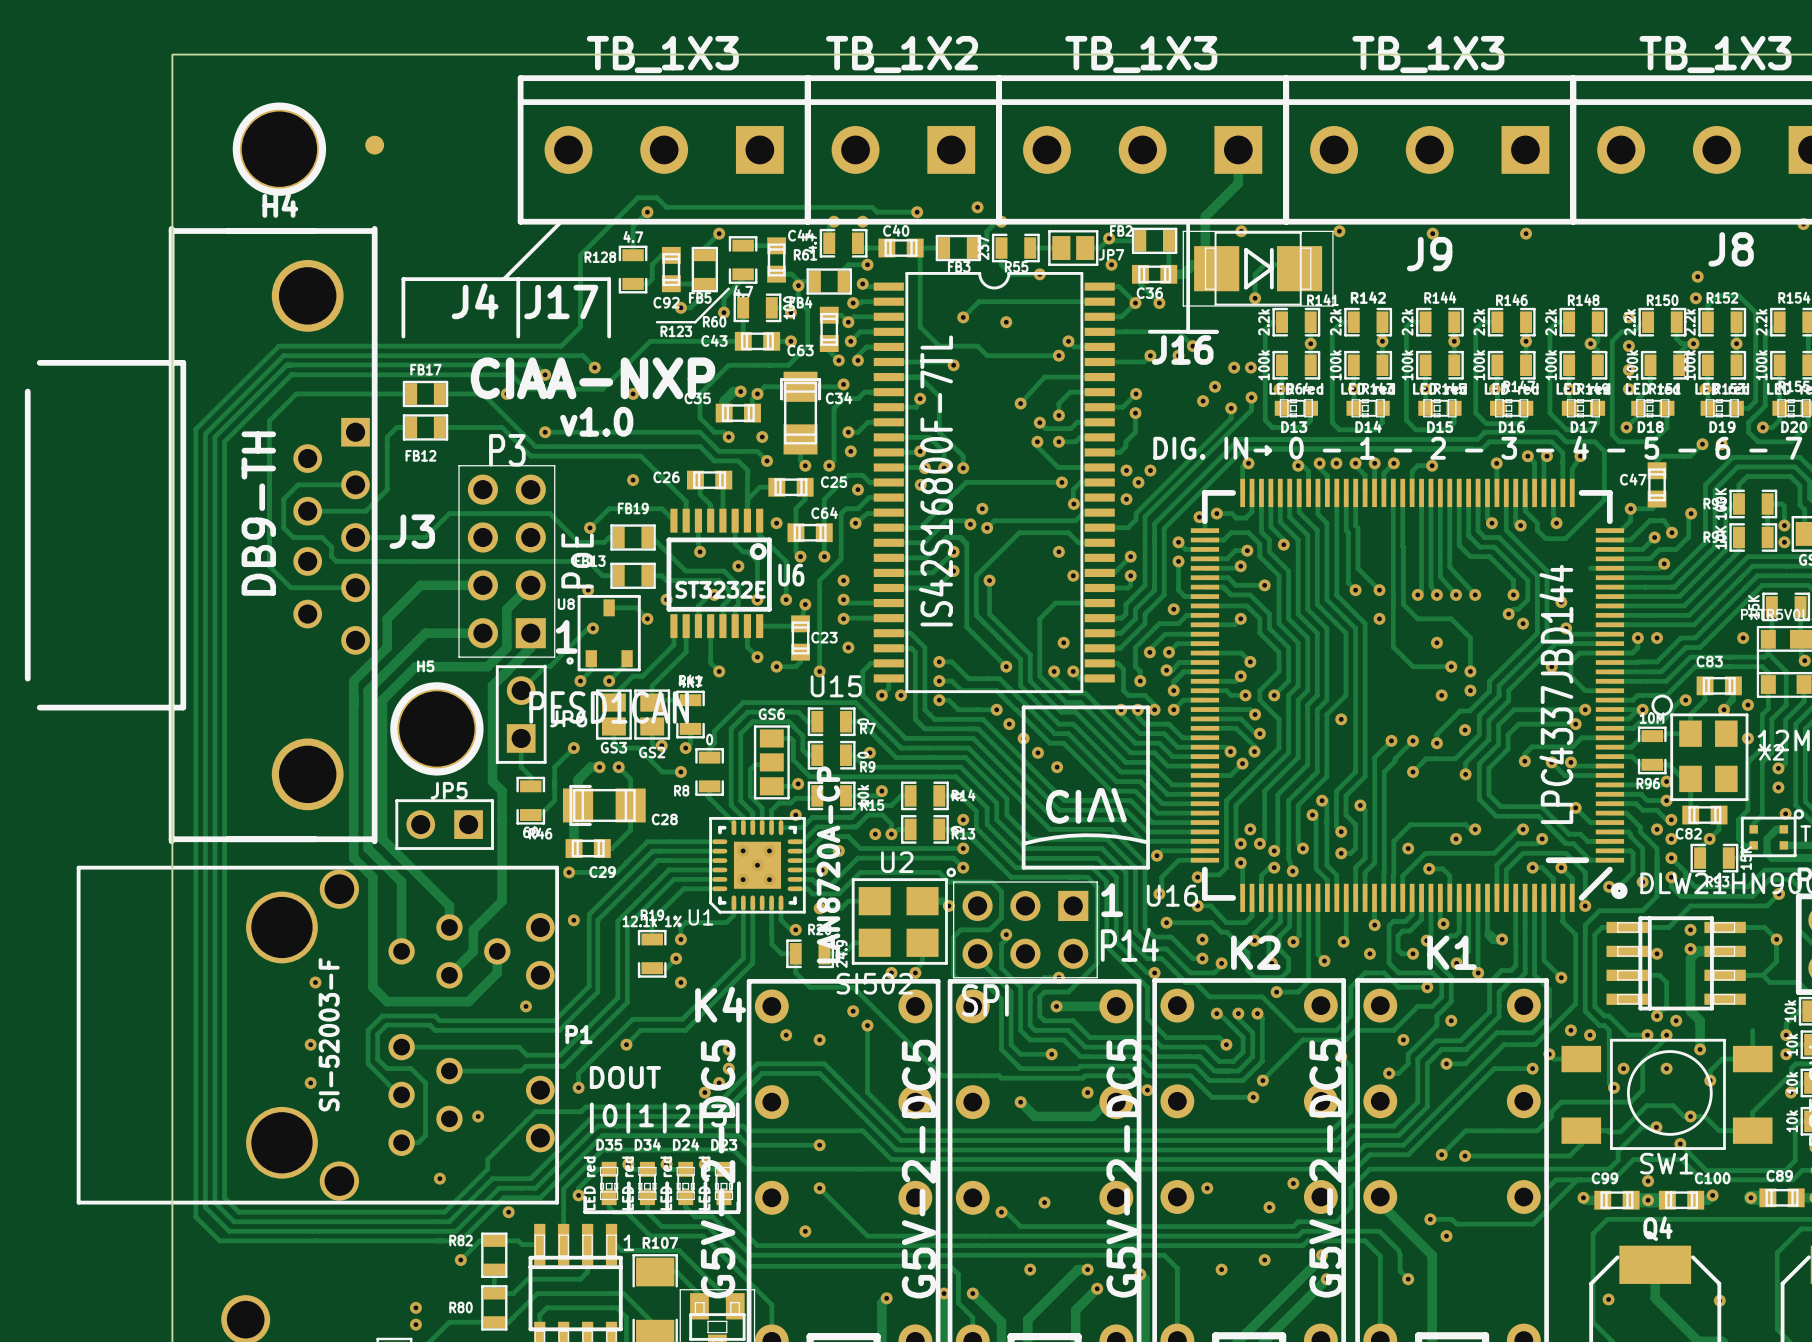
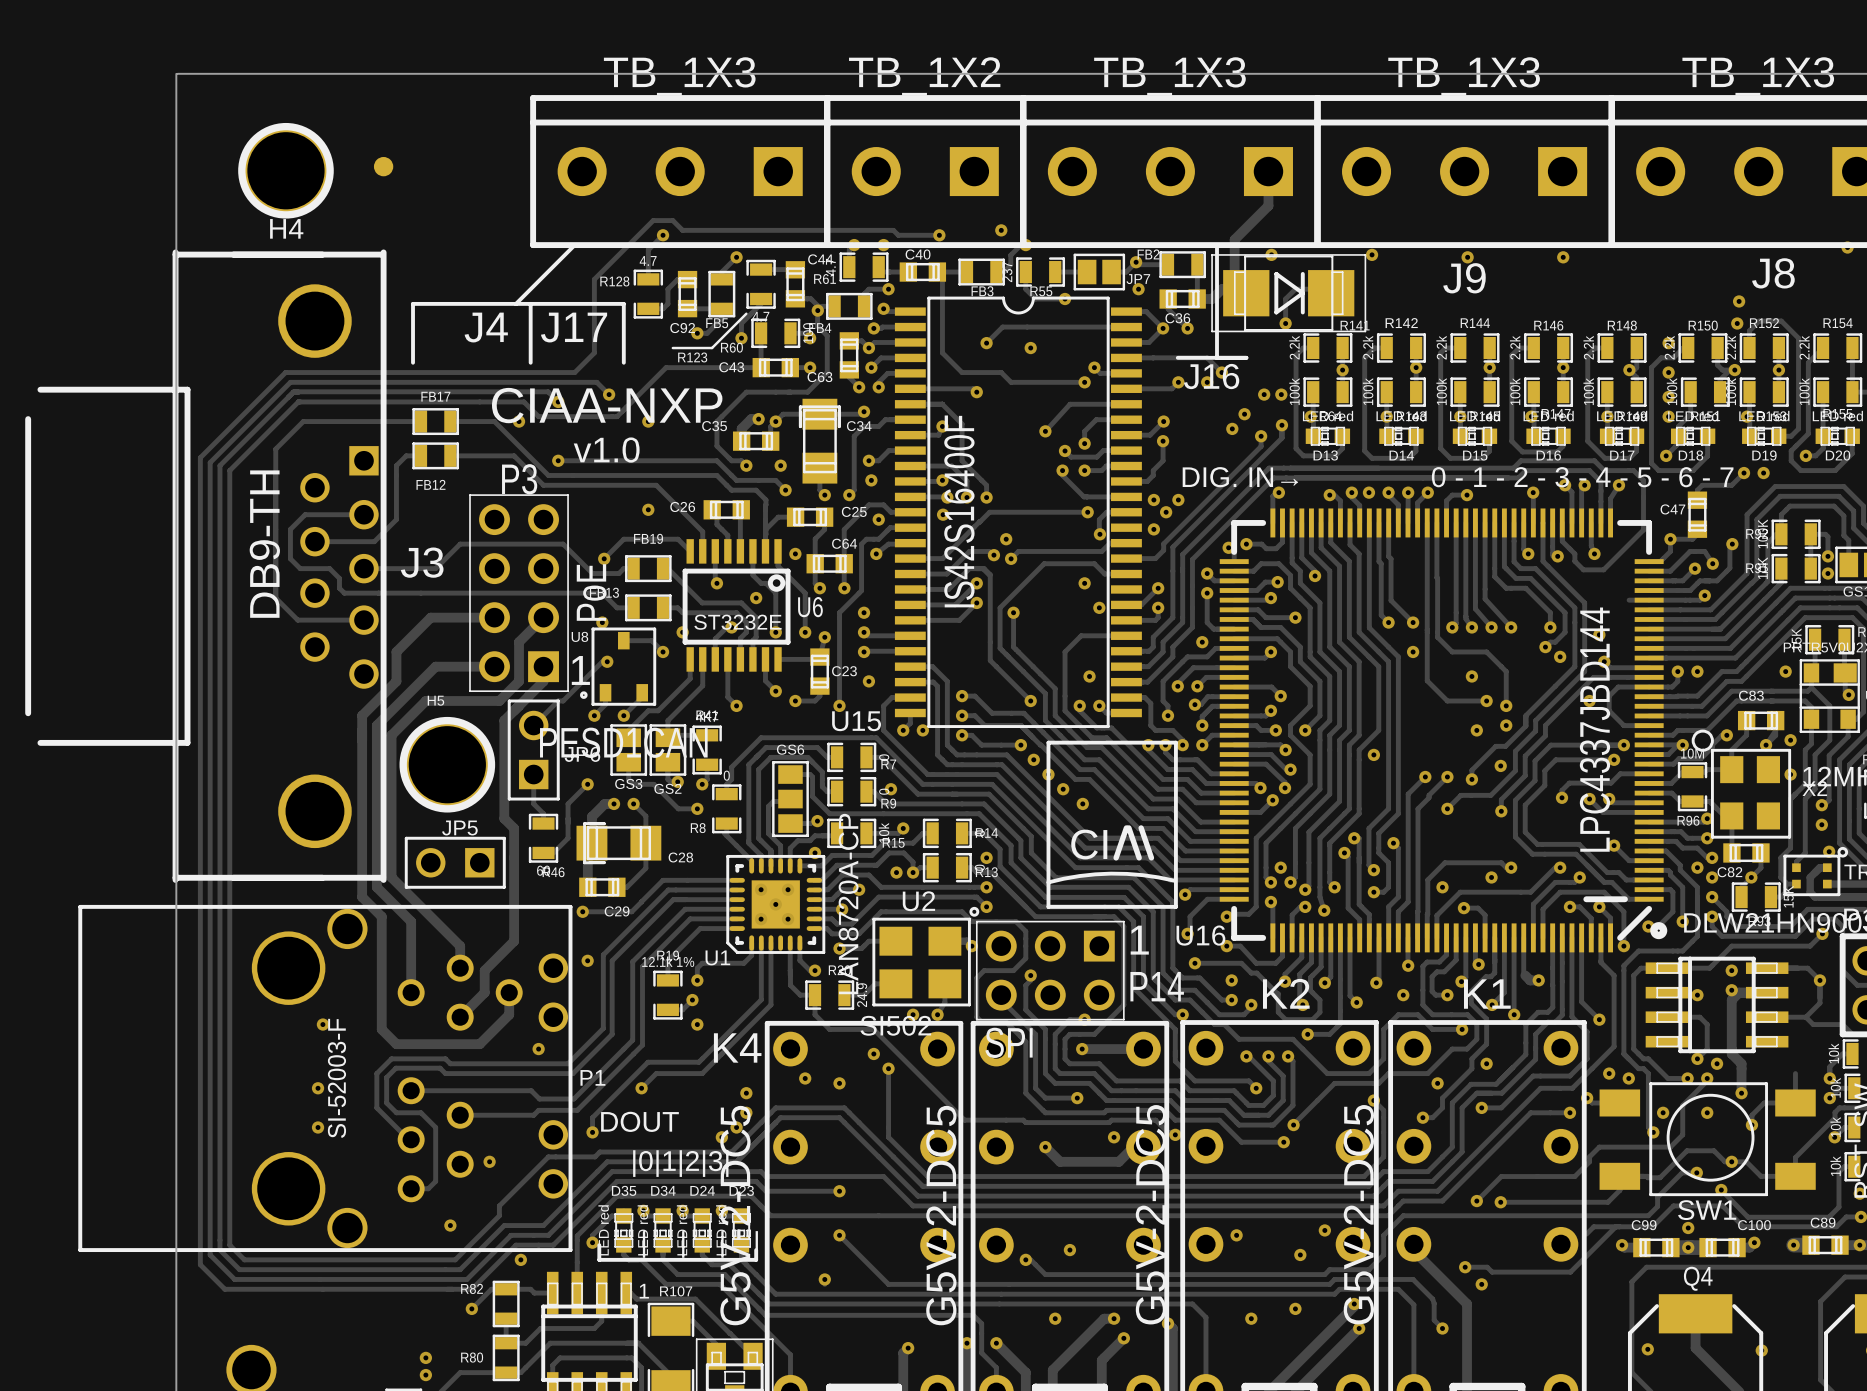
U15 value: IS42S16800F-7TL (936, 480) -> IS42S16400F (959, 511)

